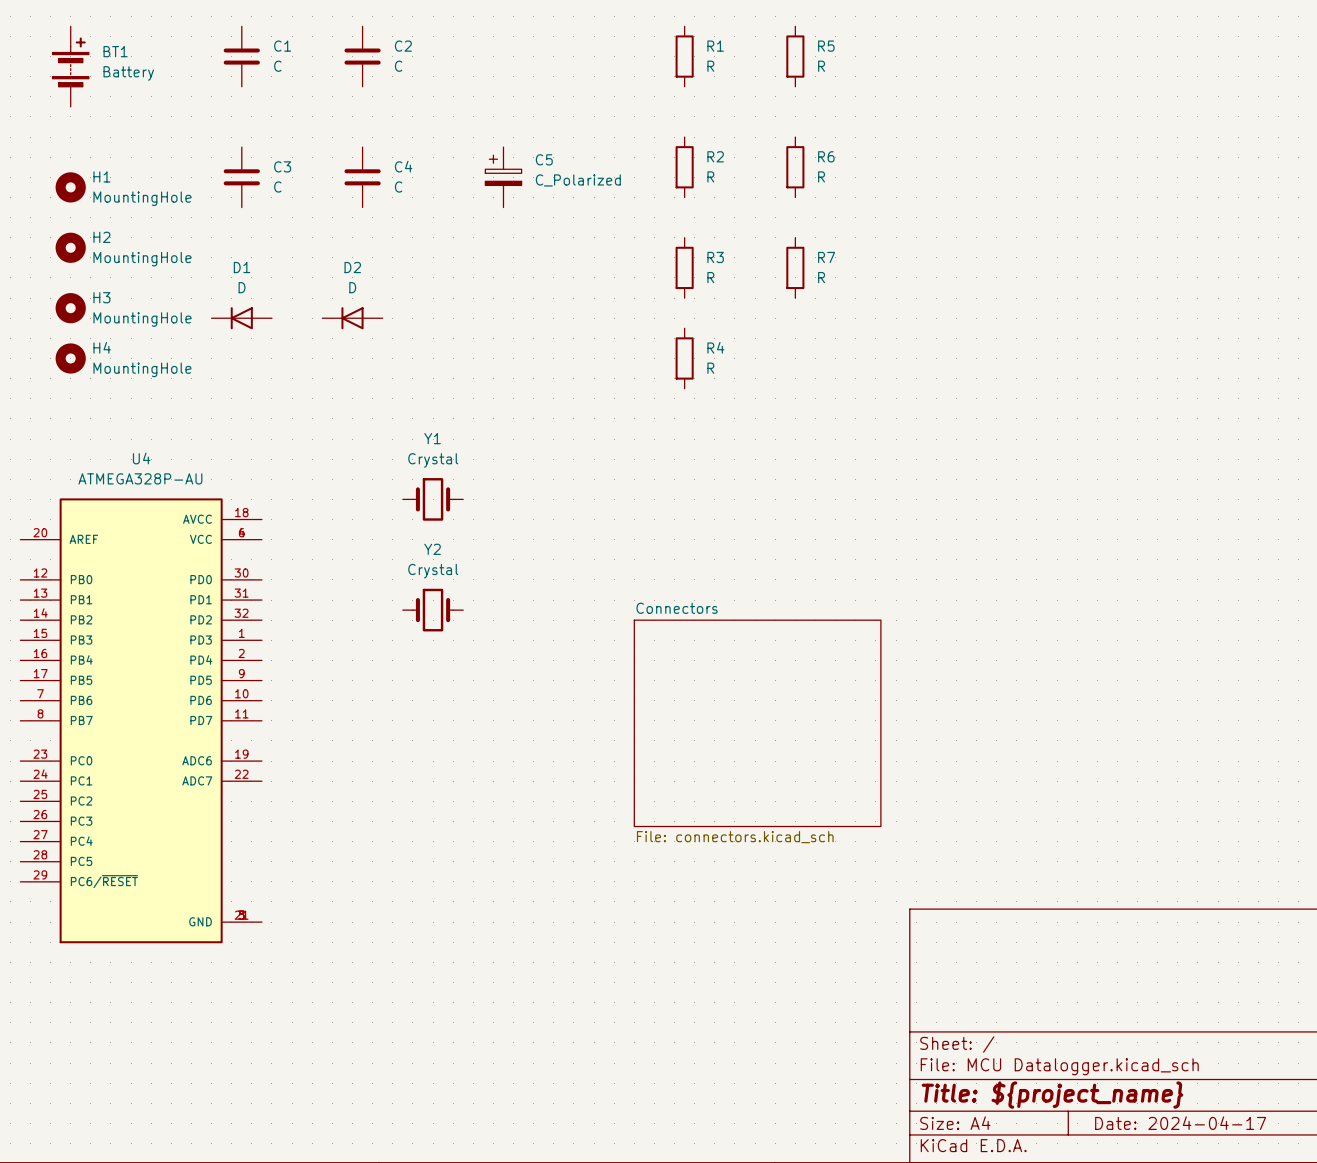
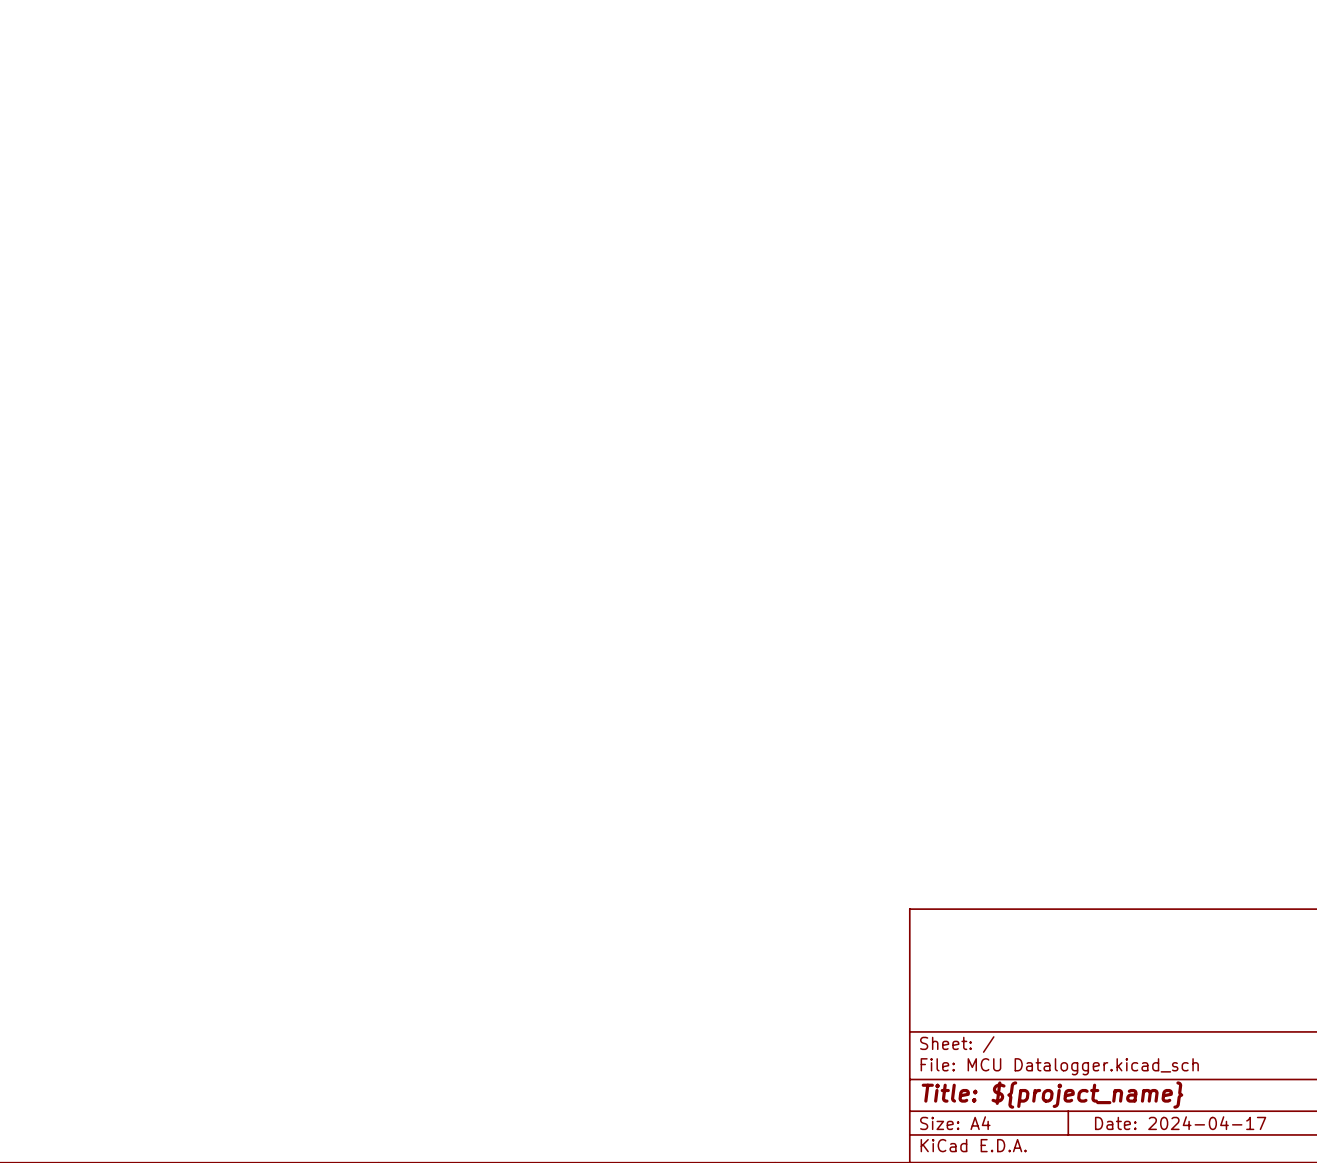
C1: C (241, 56) -> none
C2: C (362, 56) -> none
R1: R (684, 56) -> none
R5: R (795, 56) -> none
BT1: Battery (70, 66) -> none
R2: R (684, 167) -> none
R6: R (795, 167) -> none
C3: C (241, 177) -> none
C4: C (362, 177) -> none
C5: C_Polarized (503, 177) -> none
H1: MountingHole (70, 187) -> none
H2: MountingHole (70, 247) -> none
R3: R (684, 267) -> none
R7: R (795, 267) -> none
H3: MountingHole (70, 308) -> none
D1: D (241, 318) -> none
D2: D (352, 318) -> none
H4: MountingHole (70, 358) -> none
R4: R (684, 358) -> none
Y1: Crystal (433, 499) -> none
Y2: Crystal (433, 610) -> none
U4: ATMEGA328P-AU (141, 720) -> none
sheet Connectors: File: connectors.kicad_sch (757, 723) -> none

